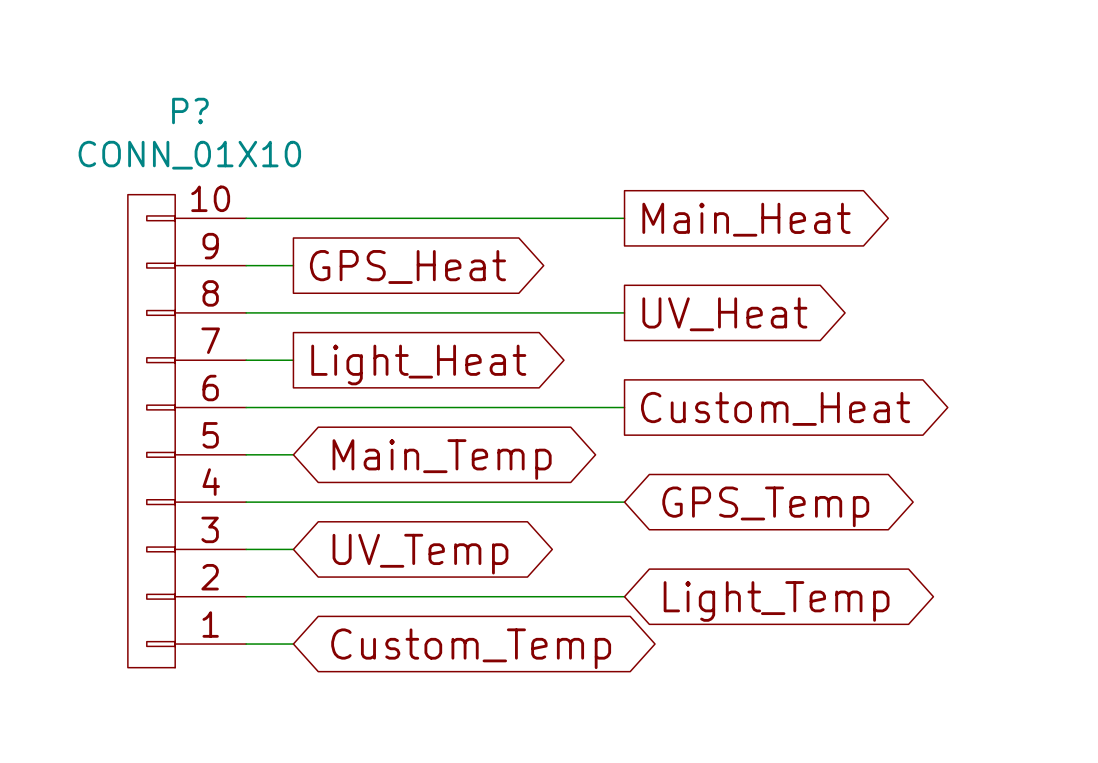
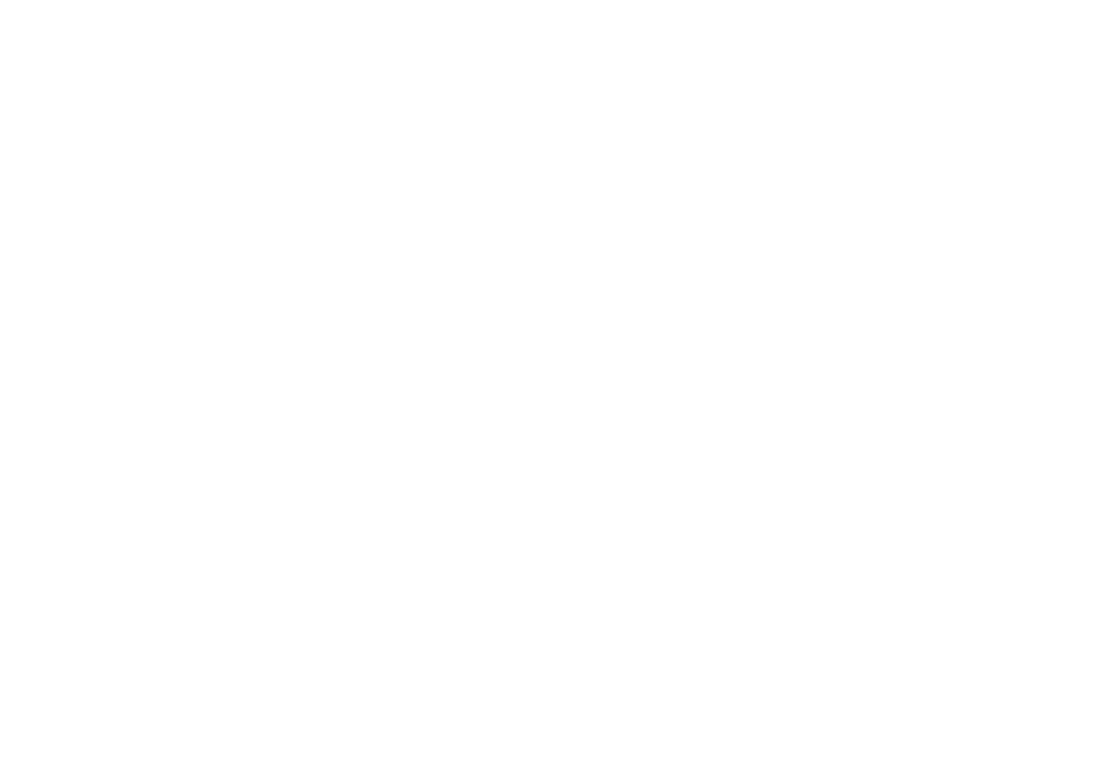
wire: (246, 218) (624, 218) -> none
global label: Main_Heat (746, 219) -> none
wire: (246, 265) (293, 265) -> none
global label: GPS_Heat (407, 266) -> none
wire: (246, 312) (624, 312) -> none
global label: UV_Heat (724, 314) -> none
wire: (246, 360) (293, 360) -> none
global label: Light_Heat (418, 364) -> none
wire: (246, 407) (624, 407) -> none
global label: Custom_Heat (775, 408) -> none
P?: CONN_01X10 (187, 431) -> none
wire: (246, 454) (293, 454) -> none
global label: Main_Temp (442, 459) -> none
wire: (246, 502) (624, 502) -> none
global label: GPS_Temp (765, 506) -> none
wire: (246, 549) (293, 549) -> none
global label: UV_Temp (420, 554) -> none
wire: (246, 596) (624, 596) -> none
global label: Light_Temp (776, 601) -> none
wire: (246, 644) (293, 644) -> none
global label: Custom_Temp (471, 648) -> none

